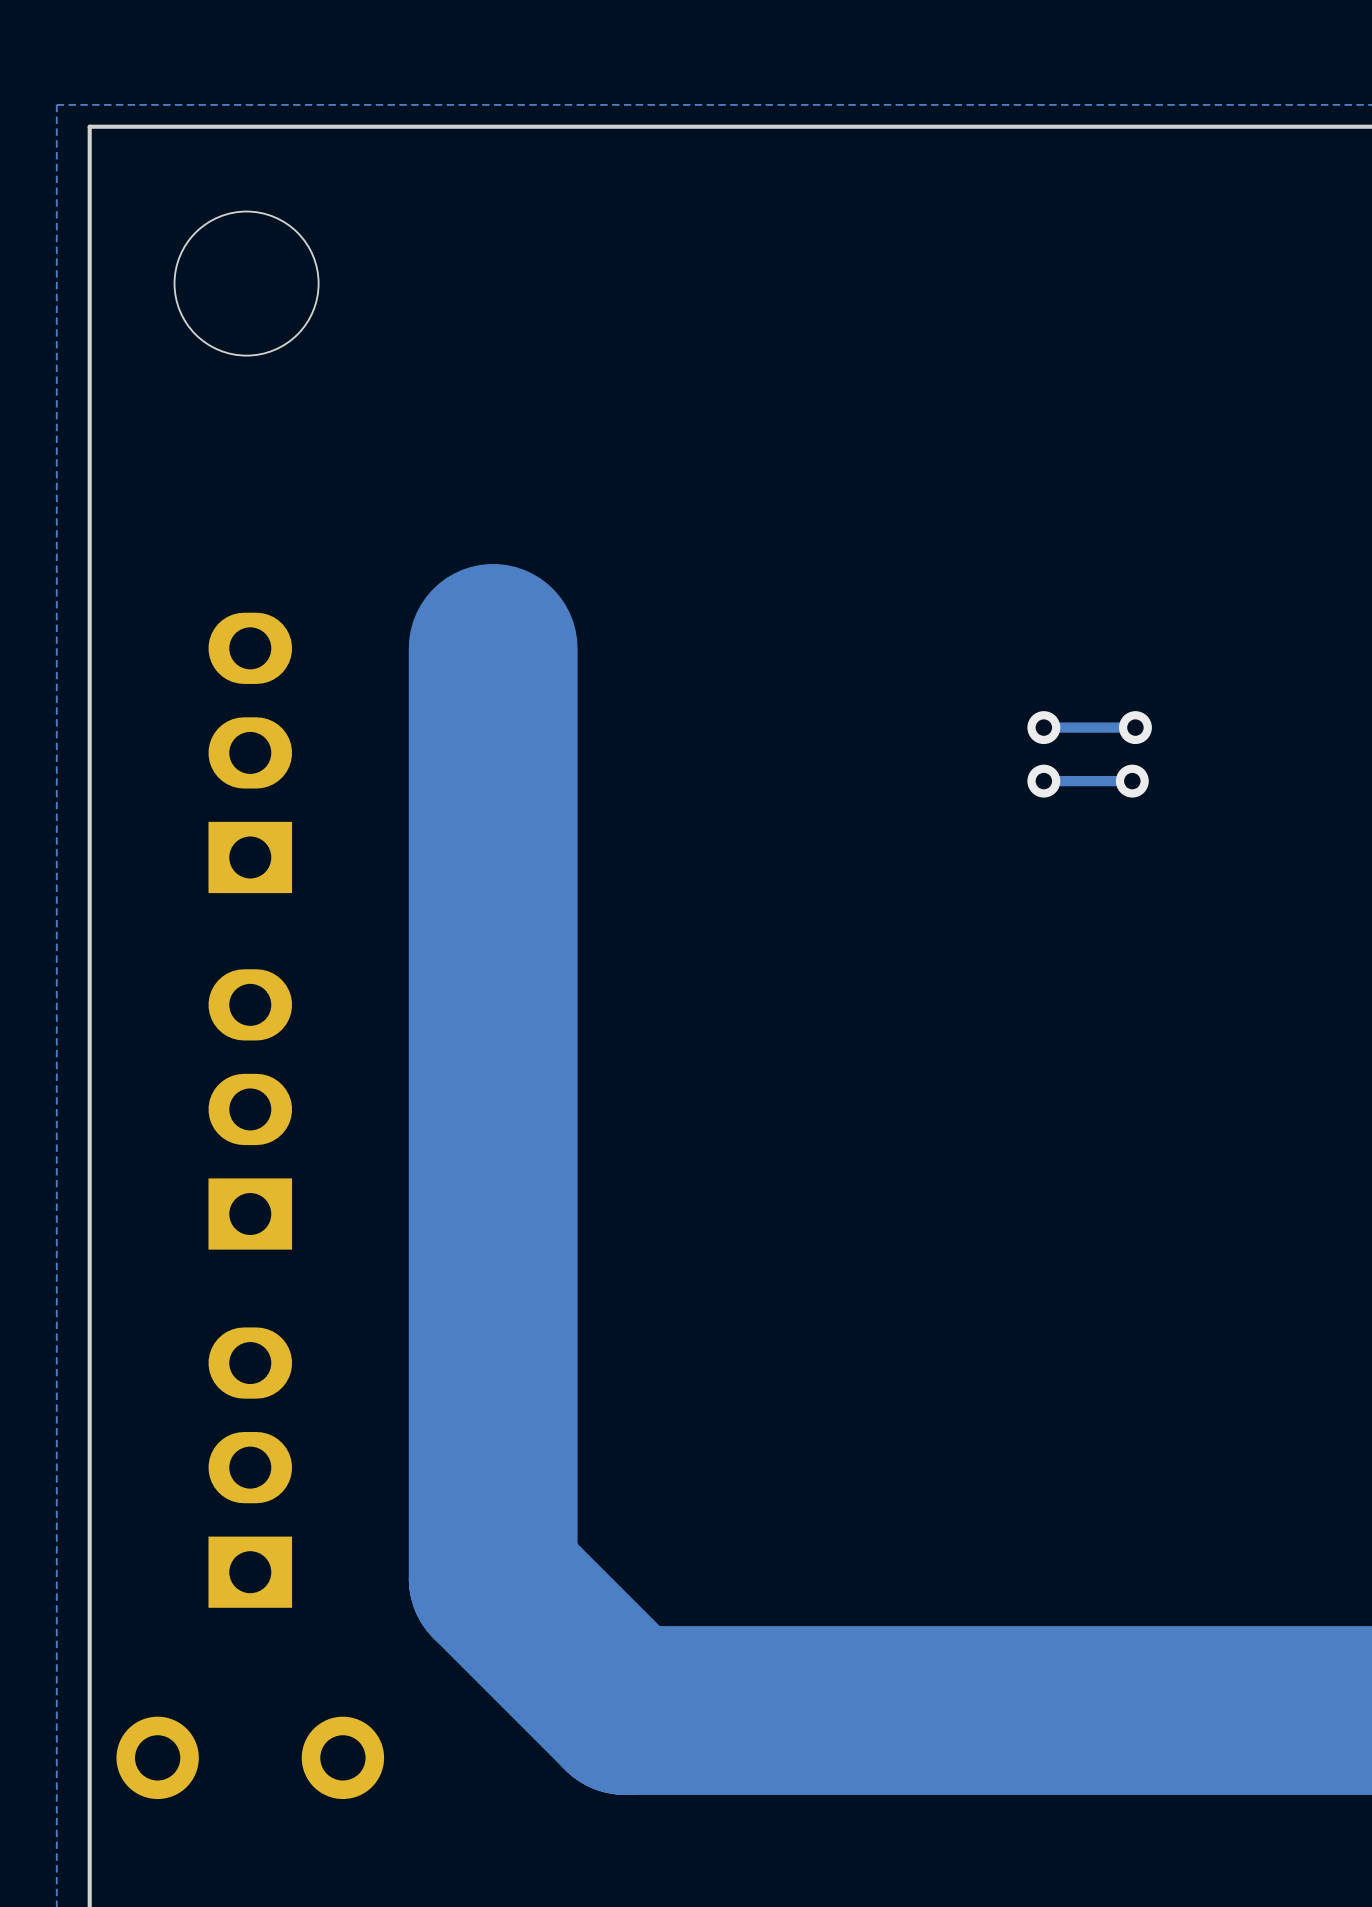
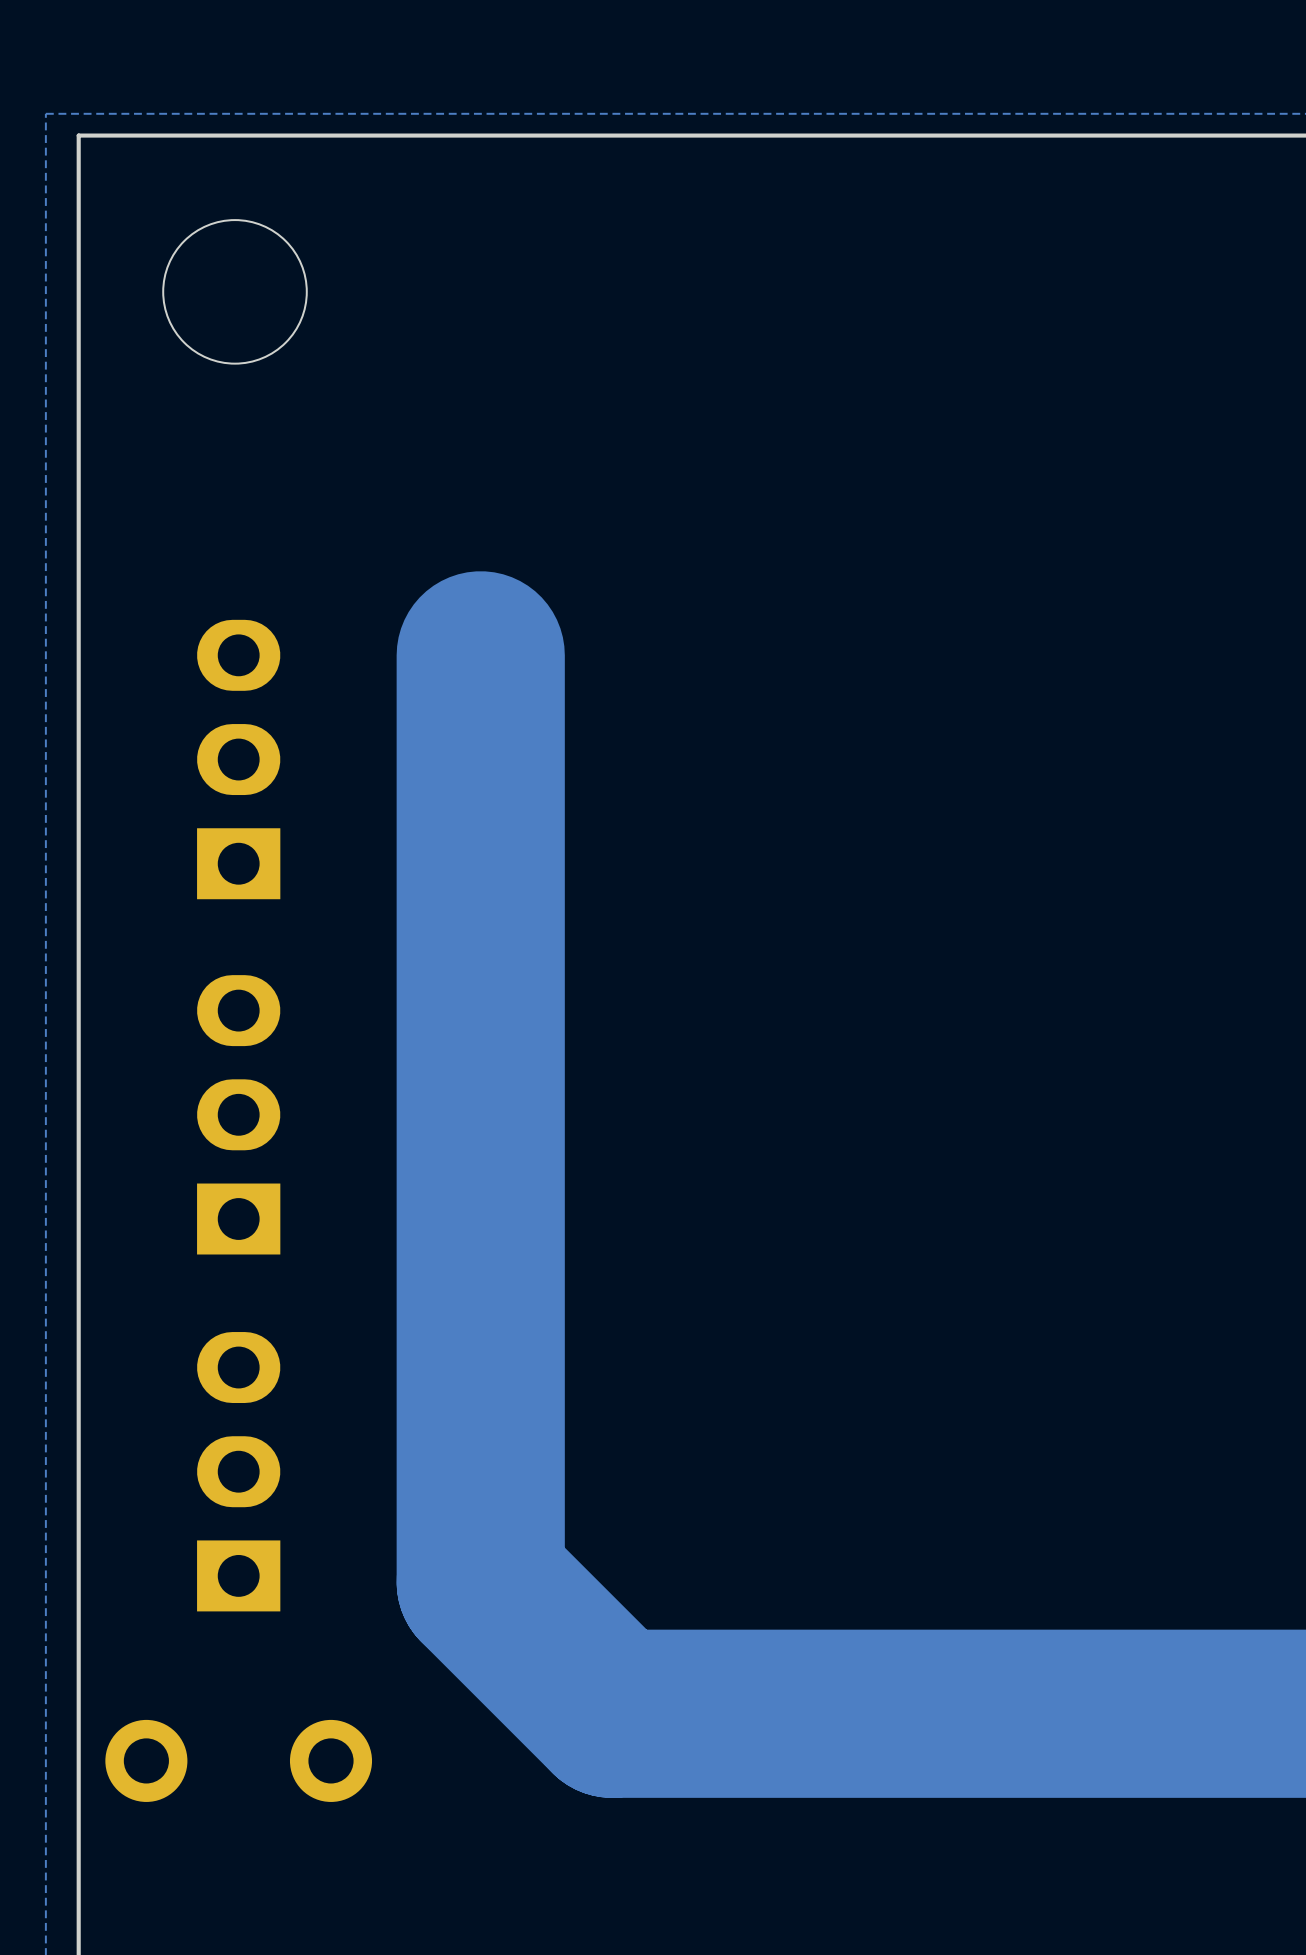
via: (1043, 727) -> none
track: (1135, 727) (1043, 727) -> none
via: (1135, 727) -> none
via: (1043, 781) -> none
track: (1132, 781) (1043, 781) -> none
via: (1132, 781) -> none

